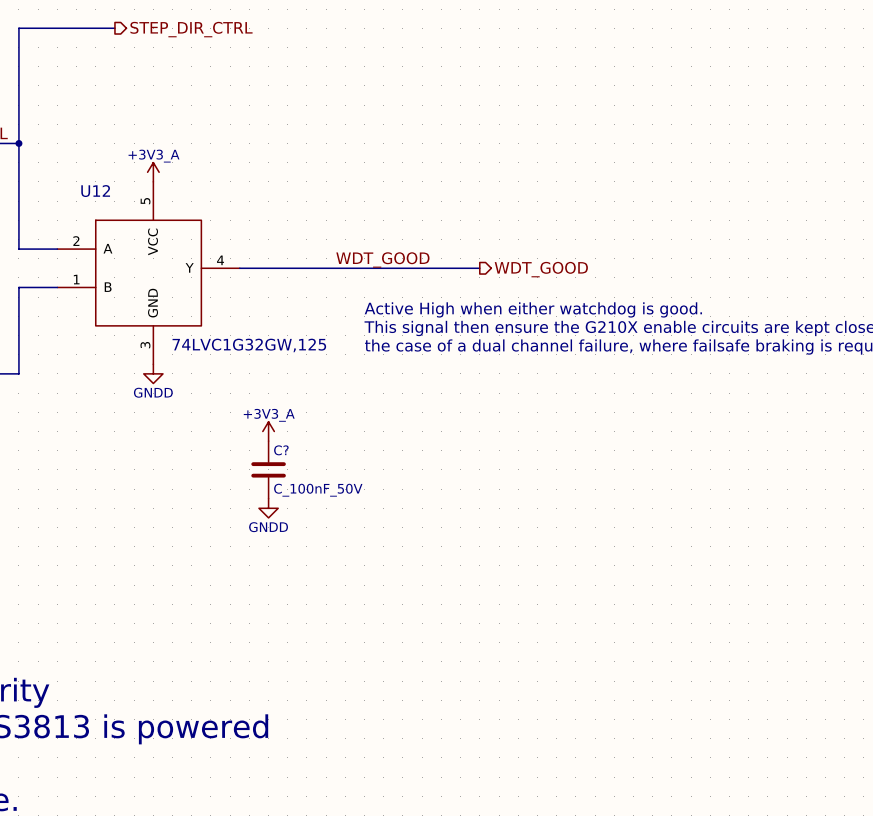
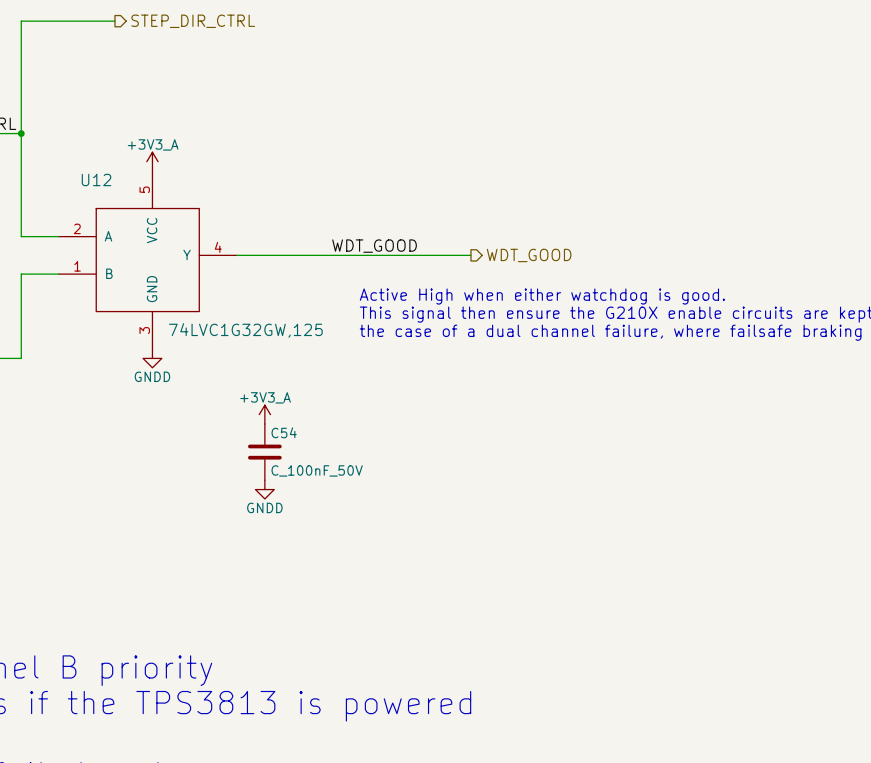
C? name: C? (281, 450) -> C54 (284, 432)

